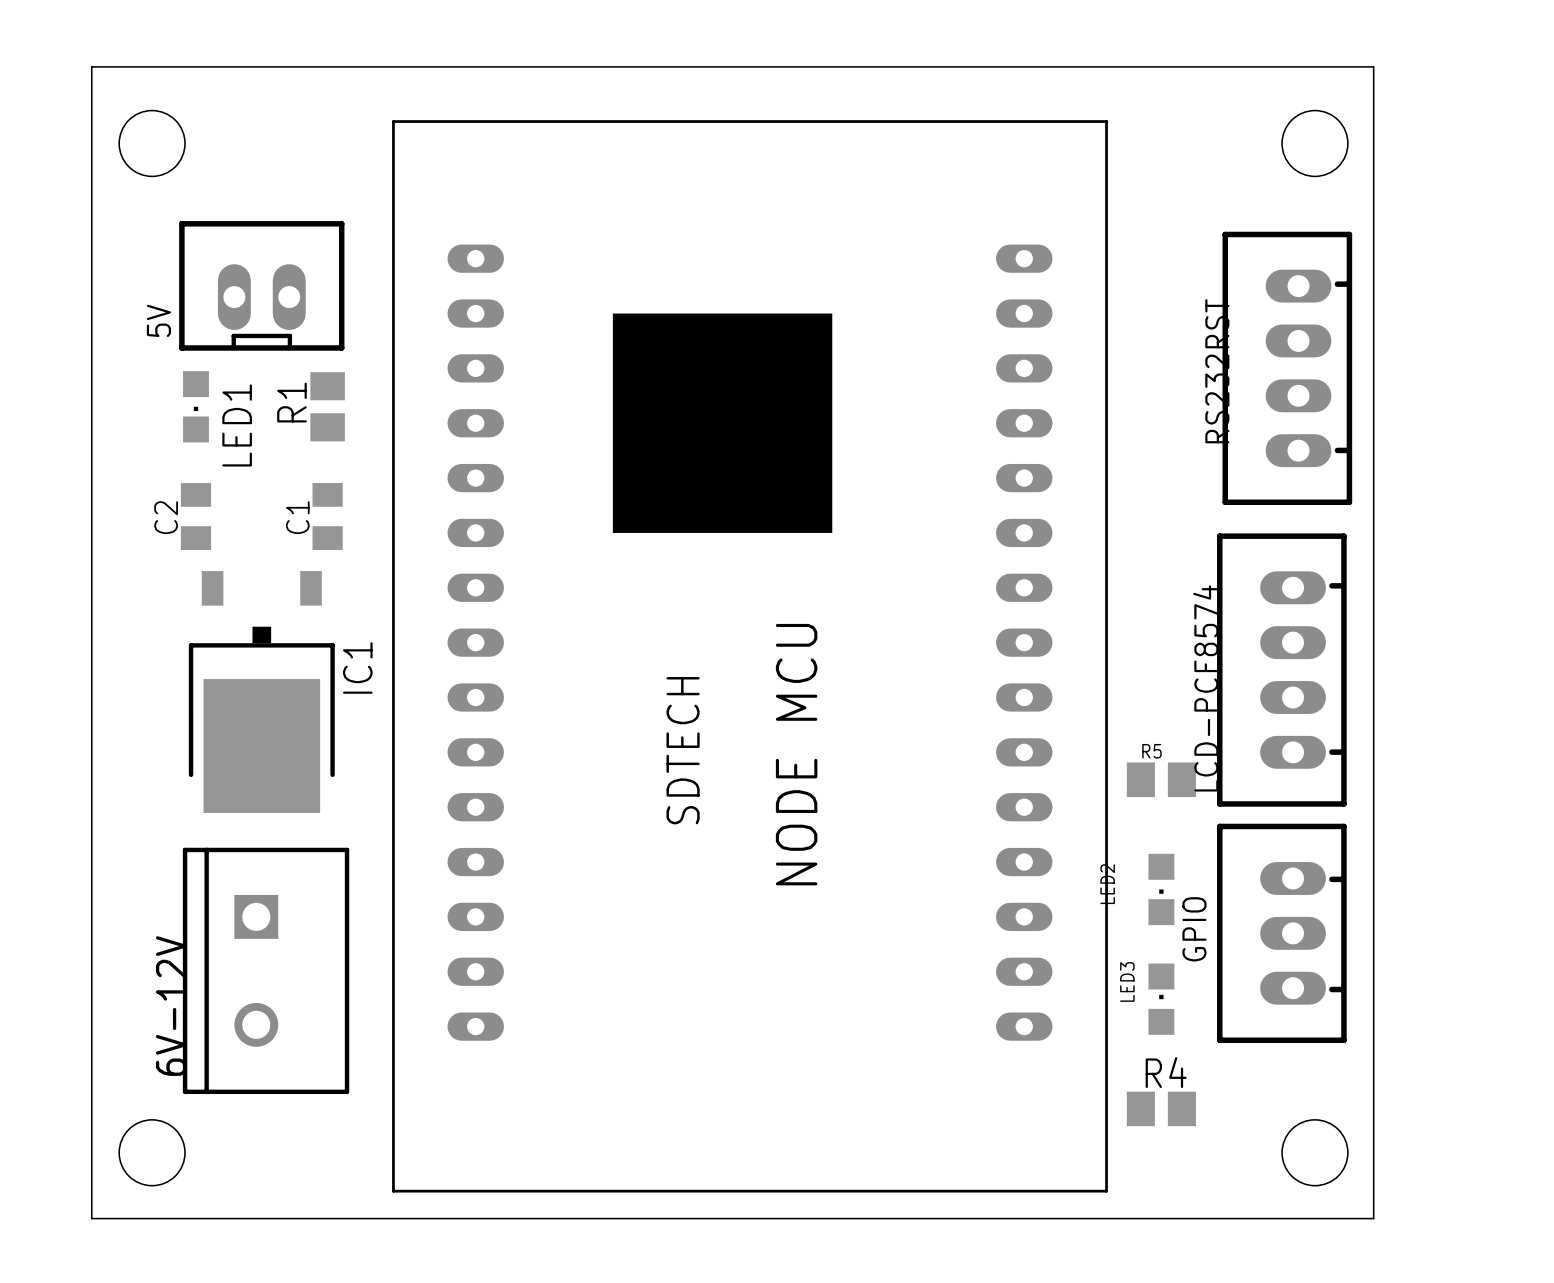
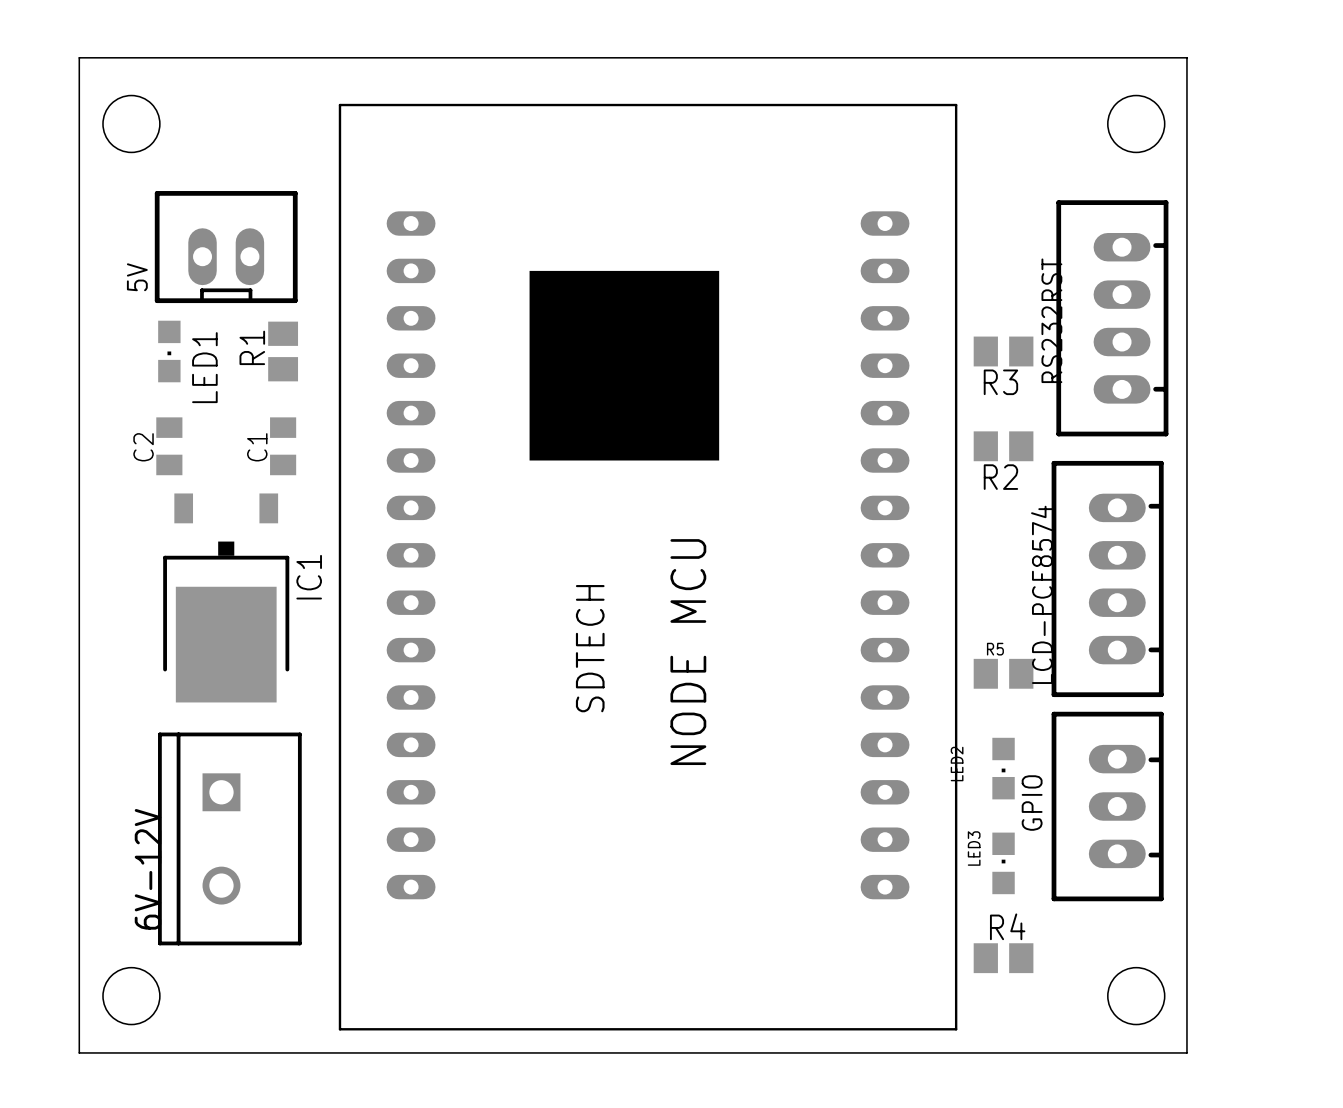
R3: none -> (1003, 351)
R2: none -> (1003, 446)

